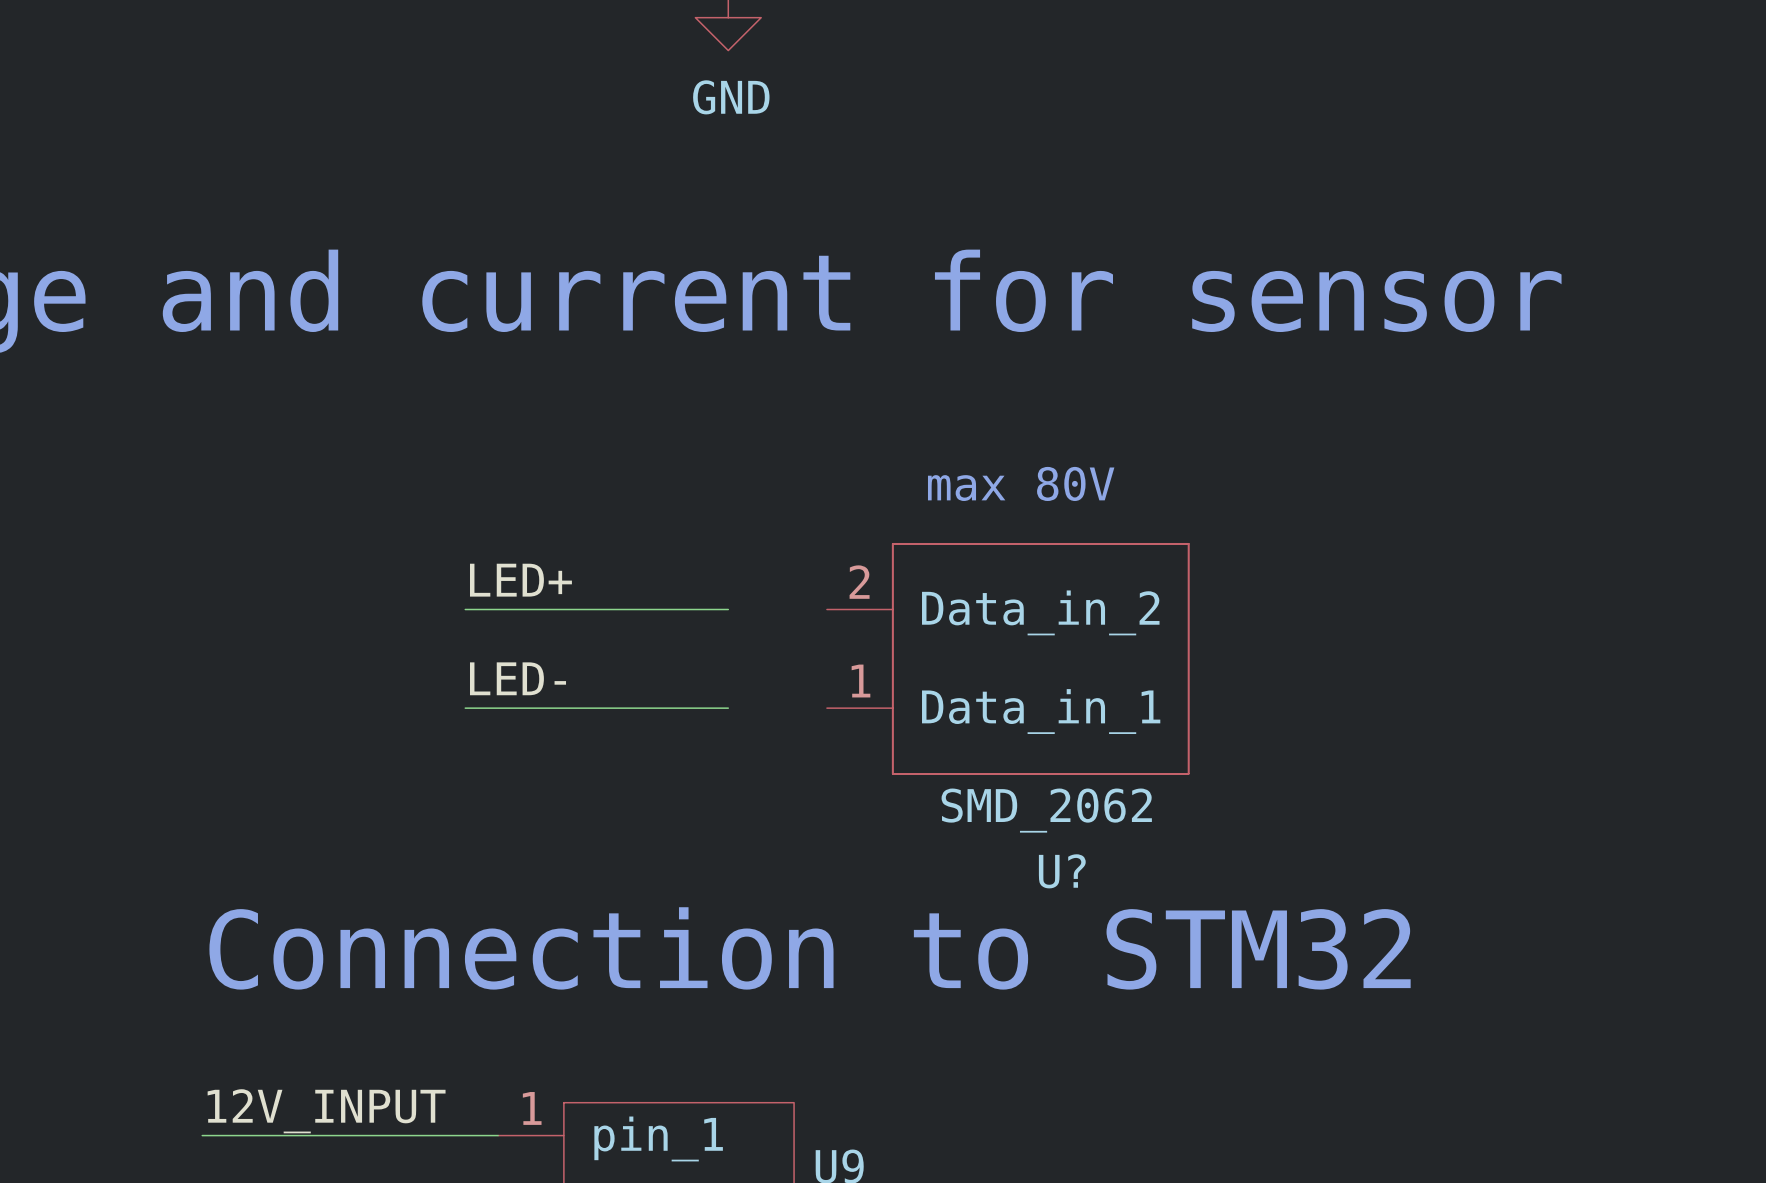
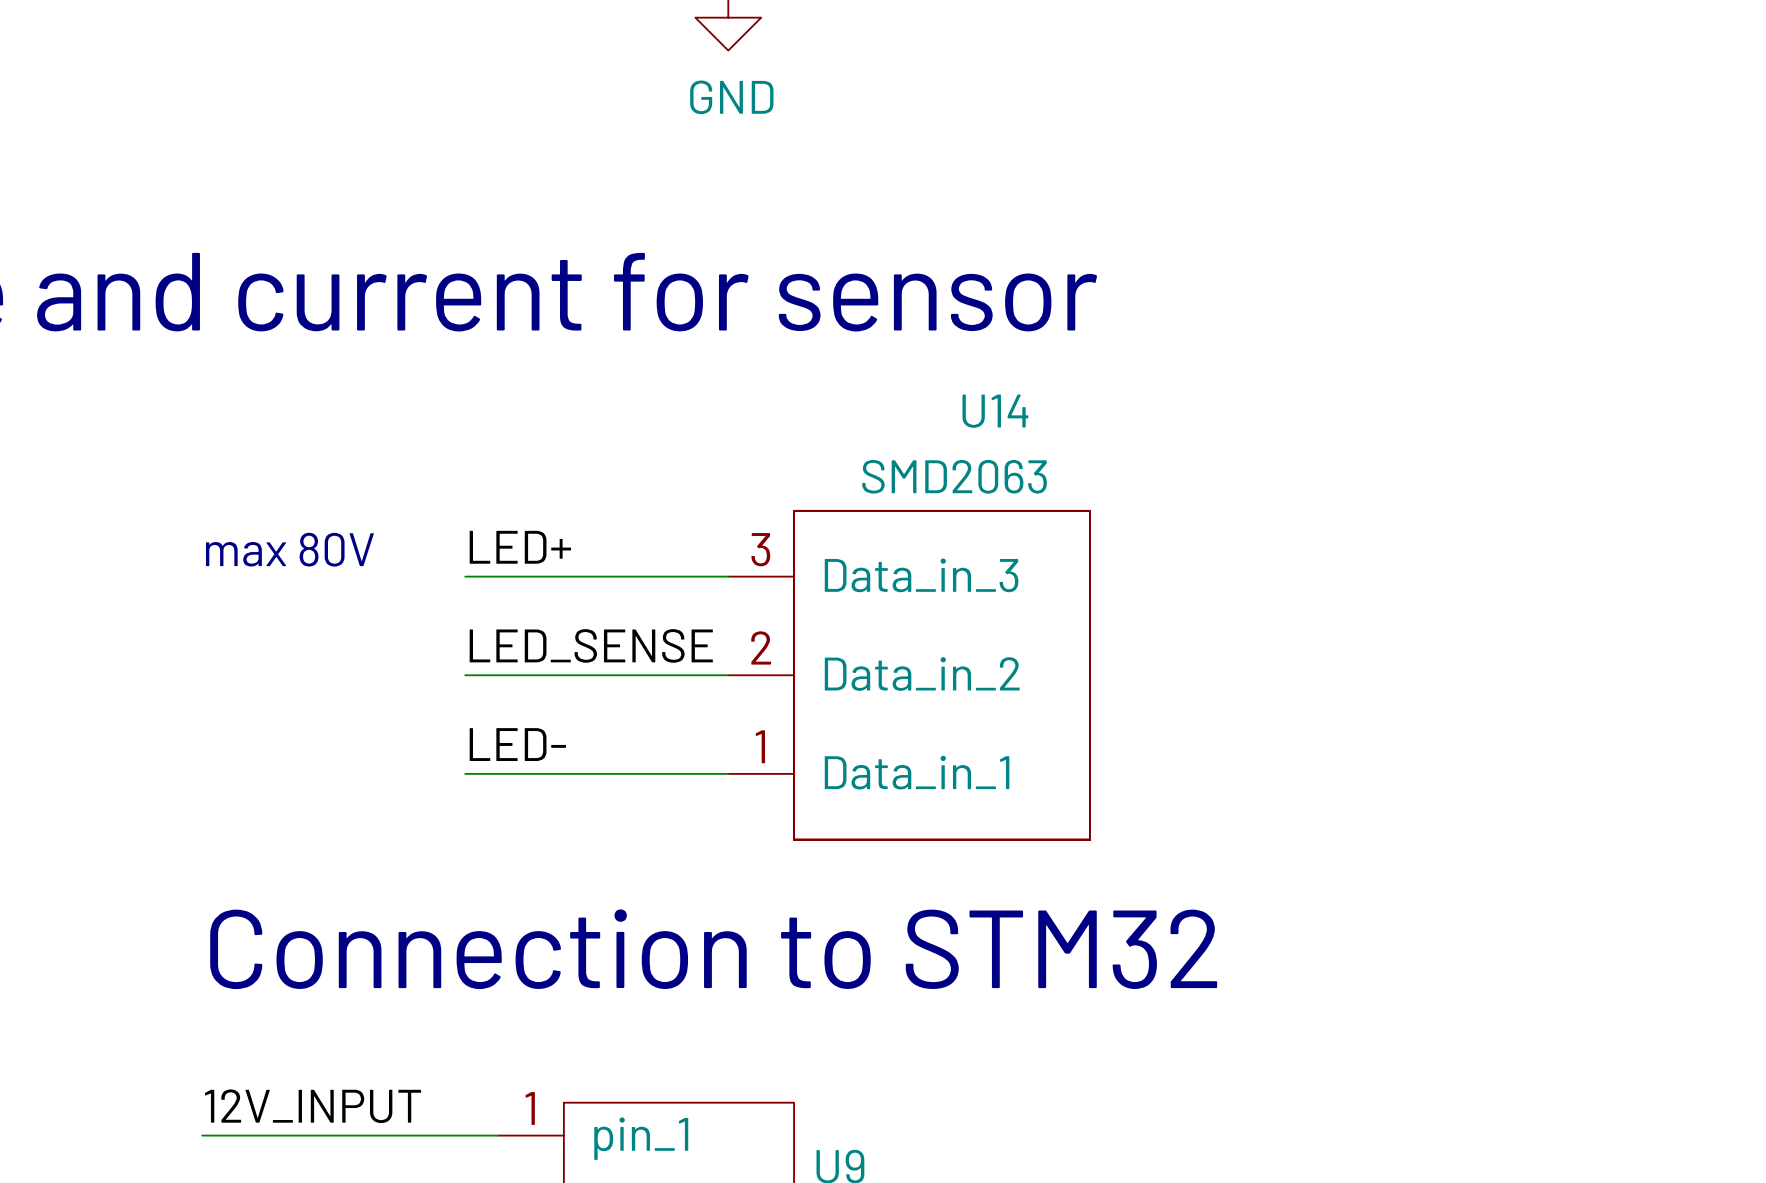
text: max 80V (1021, 483) -> none
text: none -> max 80V (289, 549)
label position: LED+ (520, 580) -> LED+ (520, 547)
wire: (465, 609) (728, 609) -> (465, 576) (728, 576)
label: none -> LED_SENSE (591, 645)
U?: SMD_2062 (1007, 658) -> none
U14: none -> SMD2063 (909, 675)
label position: LED- (518, 678) -> LED- (517, 744)
wire: (465, 708) (728, 708) -> (465, 675) (728, 675)
wire: none -> (465, 773) (728, 773)

